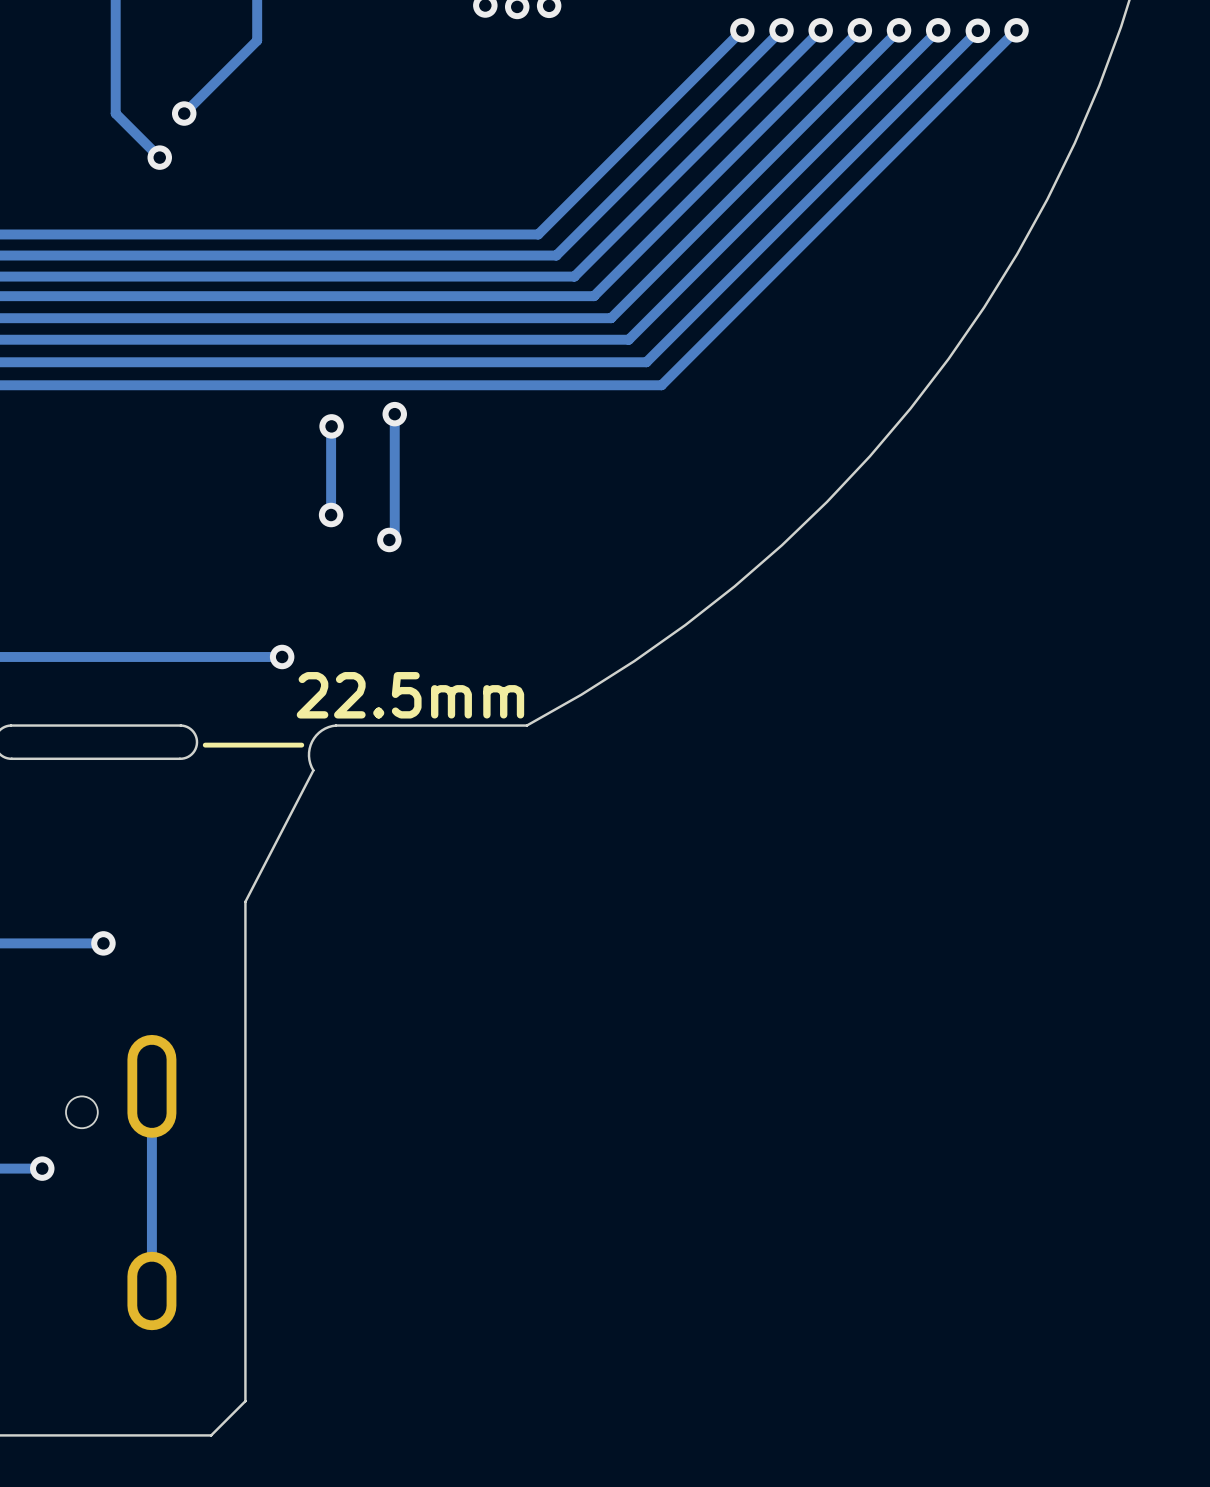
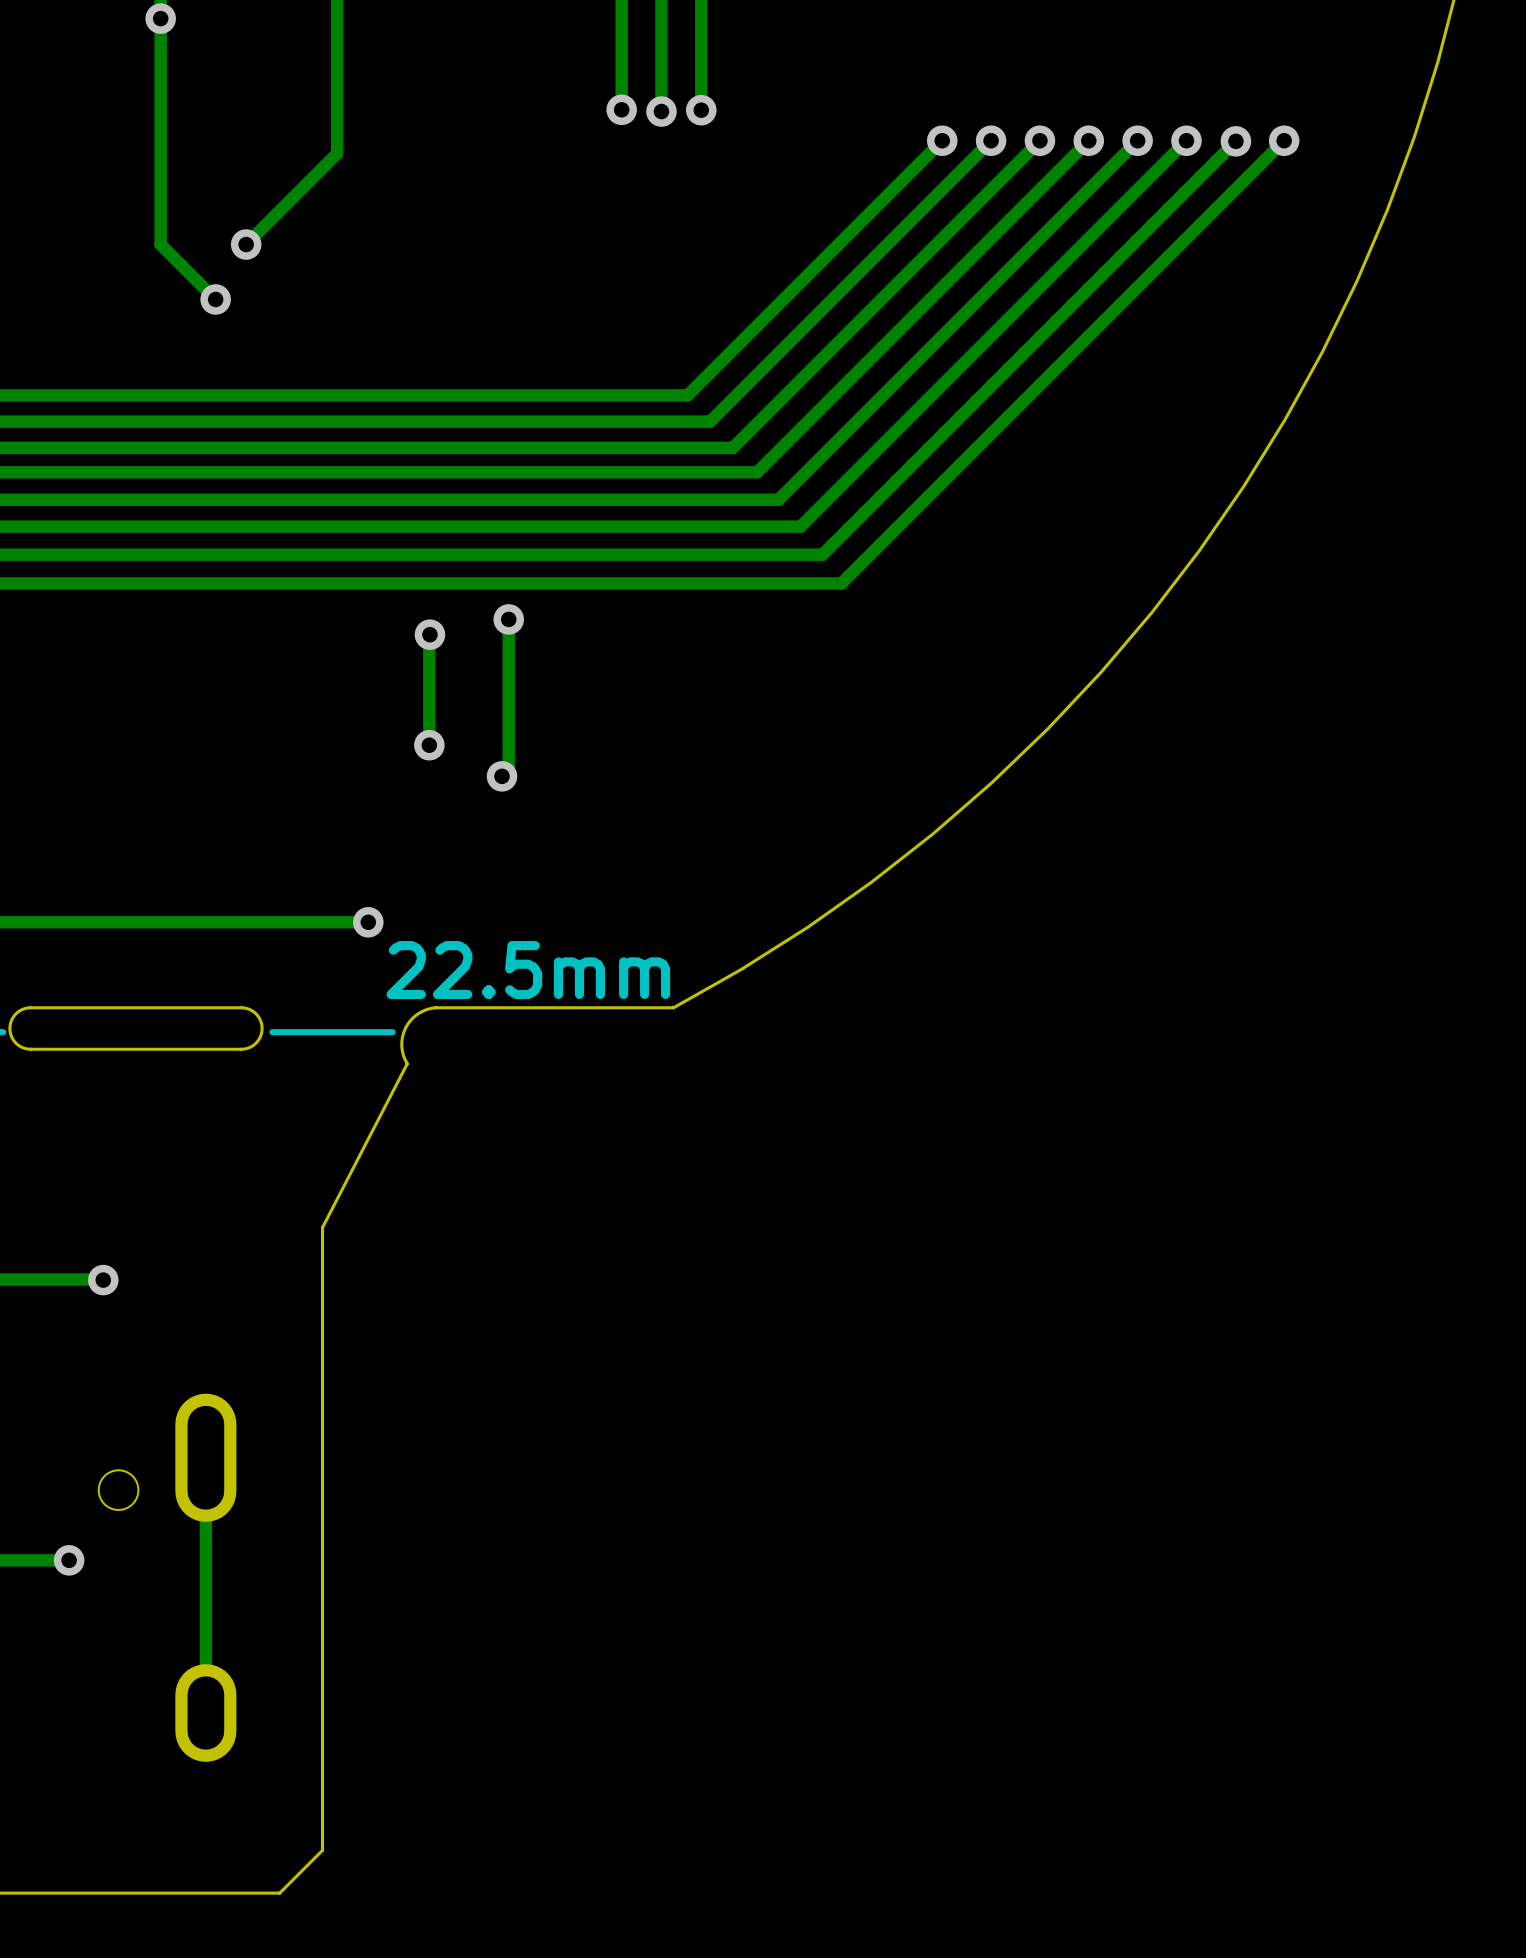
track: (103, 943) (69, 943) -> none
via position: (103, 943) -> (103, 1280)

